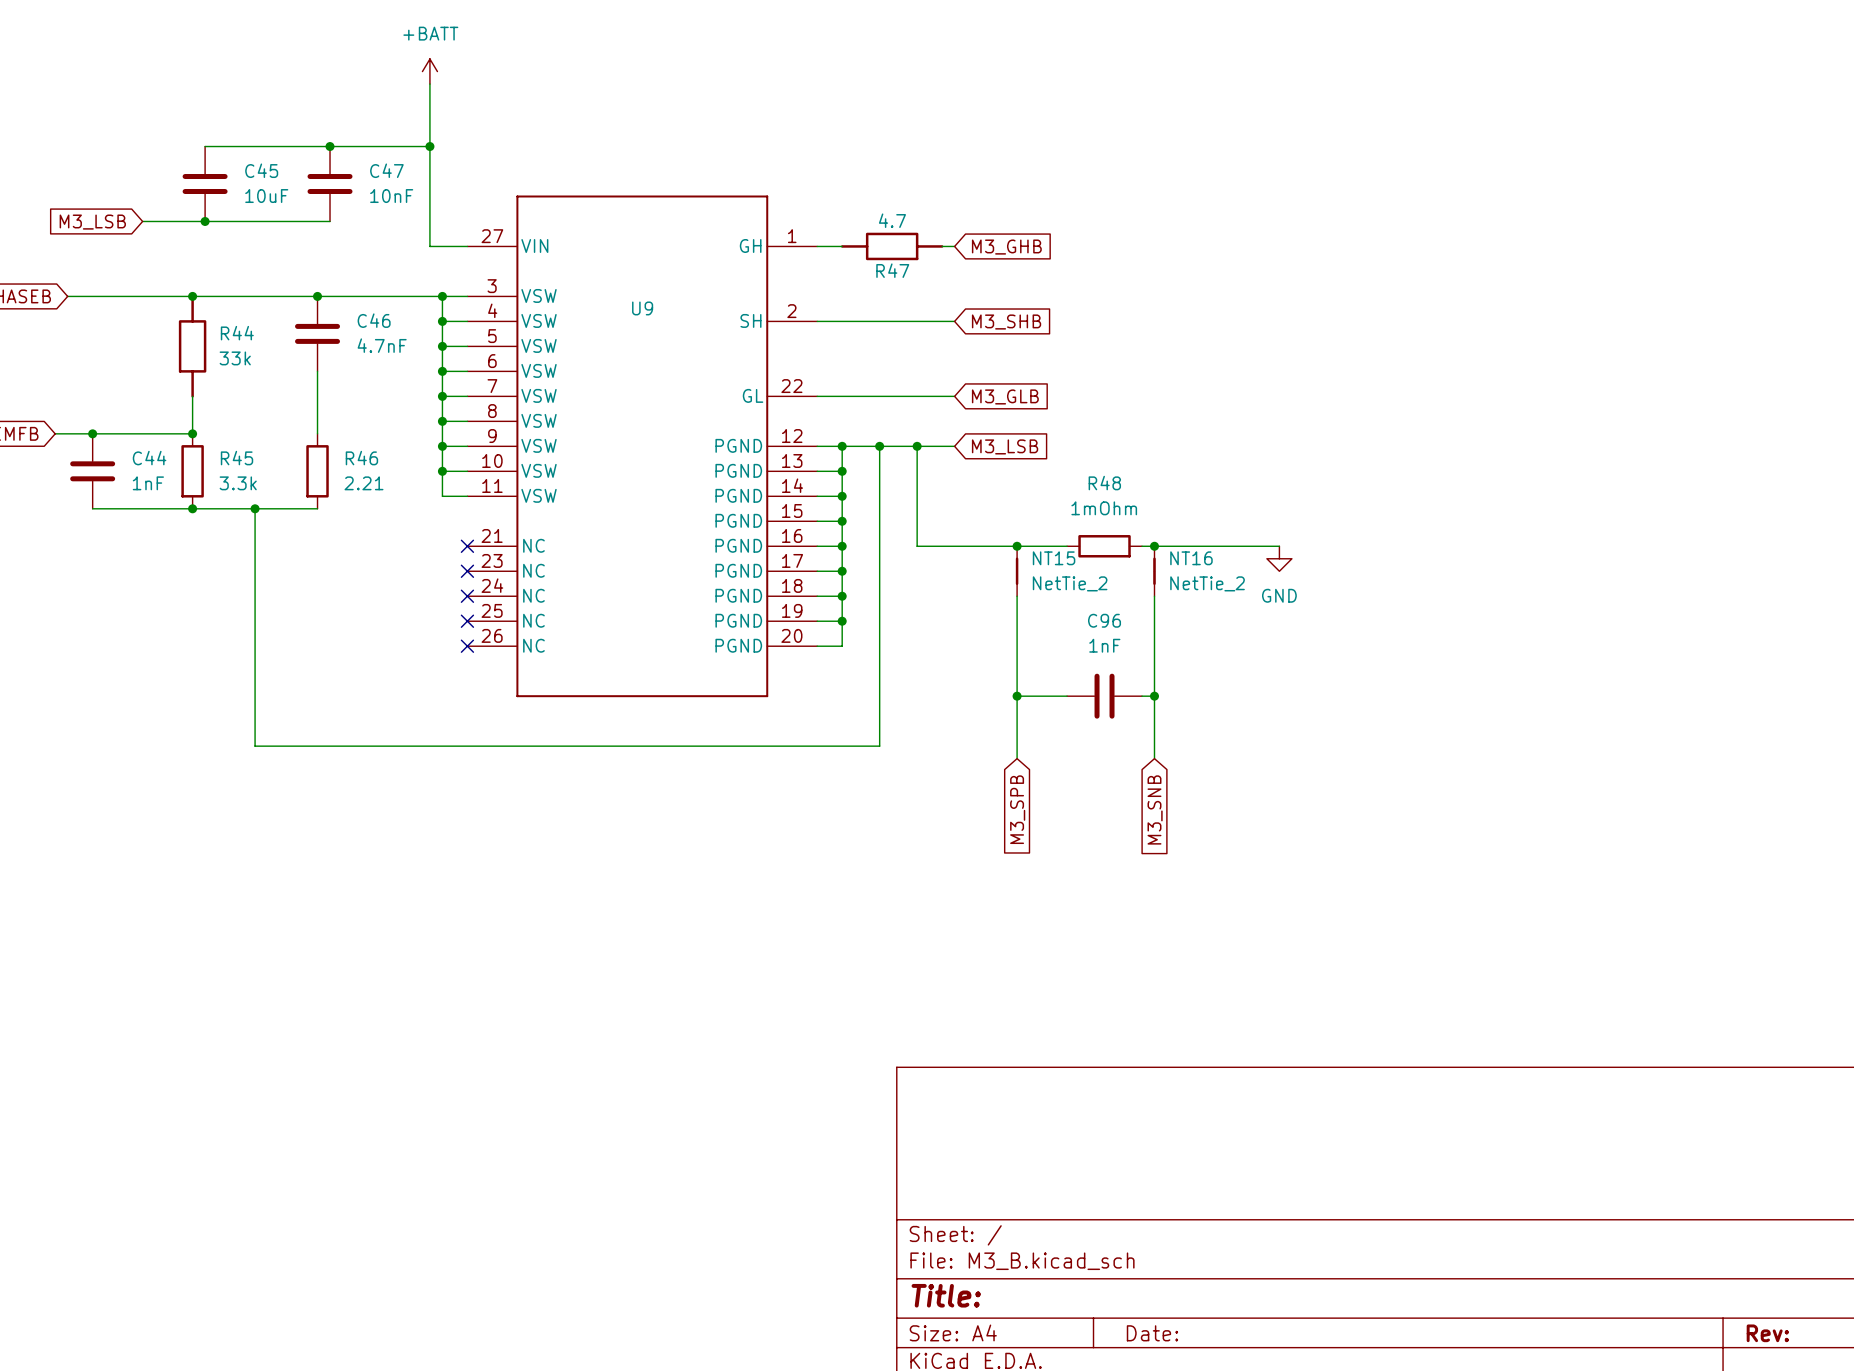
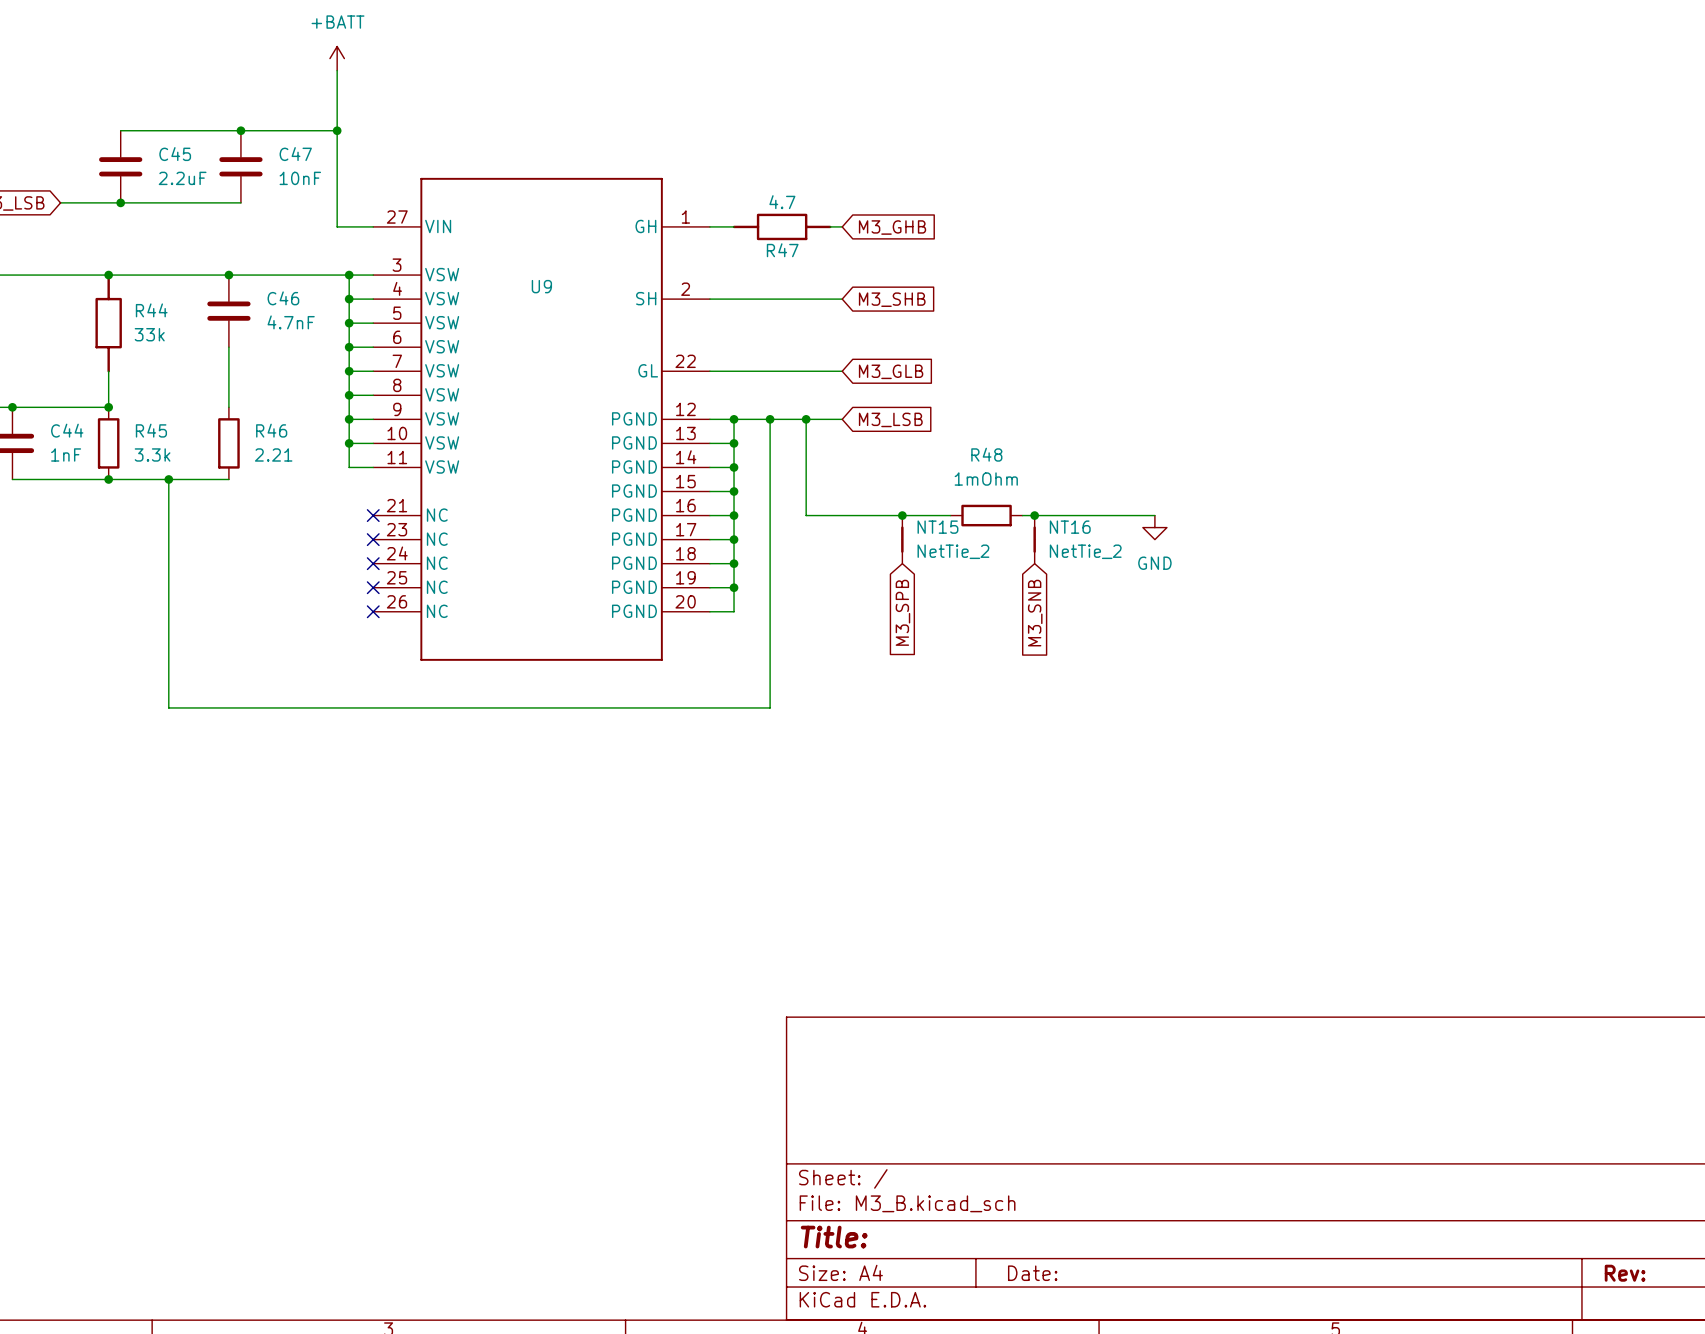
C45 value: 10uF (266, 196) -> 2.2uF (182, 178)
wire: (1017, 596) (1017, 758) -> none
wire: (1154, 596) (1154, 758) -> none
wire: (1017, 696) (1067, 696) -> none
junction: (1017, 696) -> none
C96: 1nF (1104, 696) -> none
wire: (1142, 696) (1154, 696) -> none
junction: (1154, 696) -> none
global label position: M3_SPB (1017, 809) -> M3_SPB (902, 612)
global label position: M3_SNB (1155, 809) -> M3_SNB (1035, 613)

